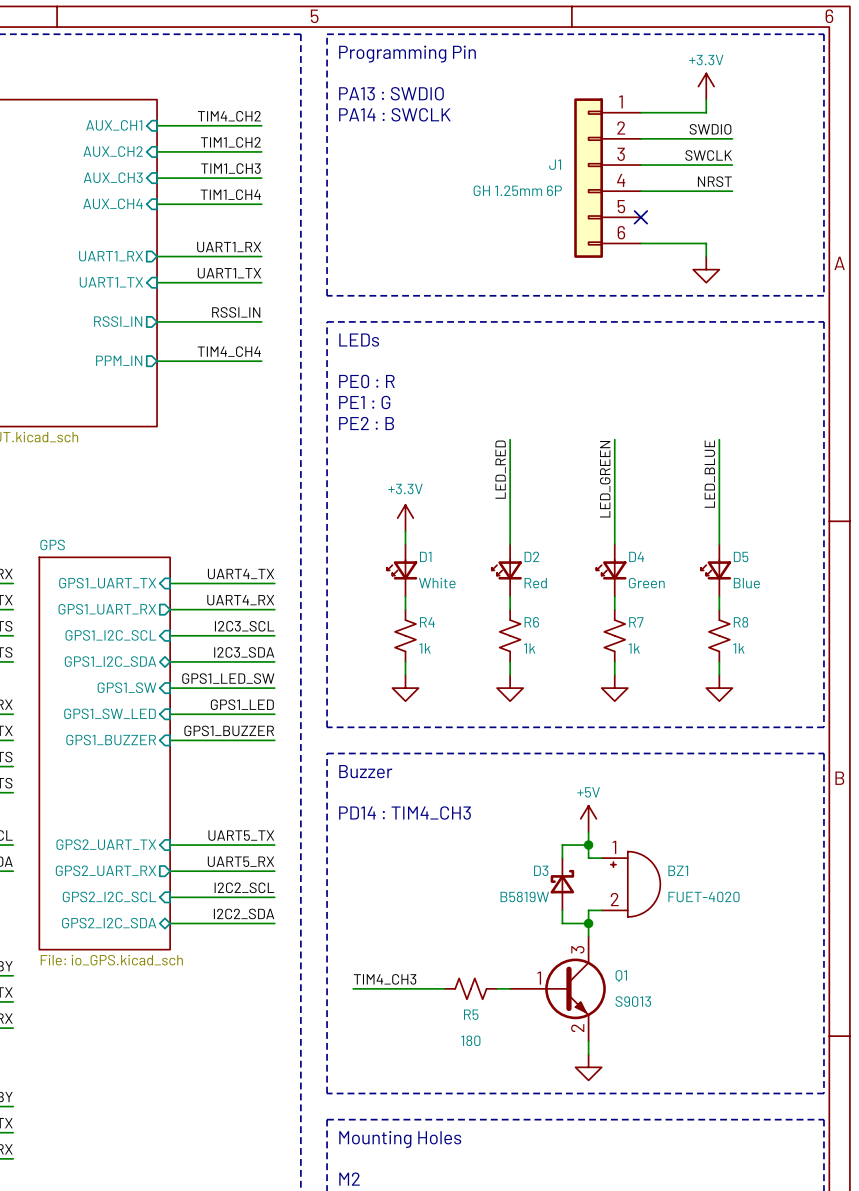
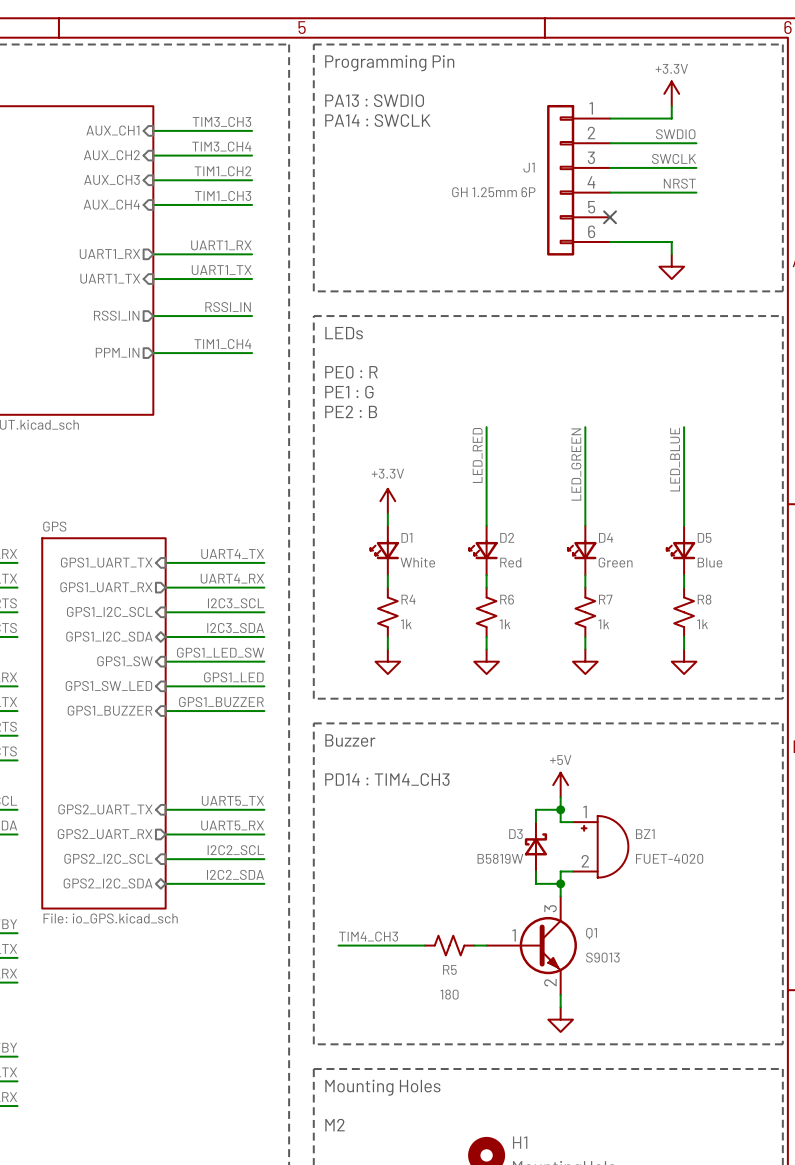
label: TIM4_CH2 (229, 116) -> TIM3_CH3 (221, 121)
label: TIM1_CH2 (230, 142) -> TIM3_CH4 (221, 146)
label: TIM1_CH3 (230, 168) -> TIM1_CH2 (222, 171)
label: TIM1_CH4 (230, 194) -> TIM1_CH3 (223, 195)
label: TIM4_CH4 (229, 351) -> TIM1_CH4 (222, 344)

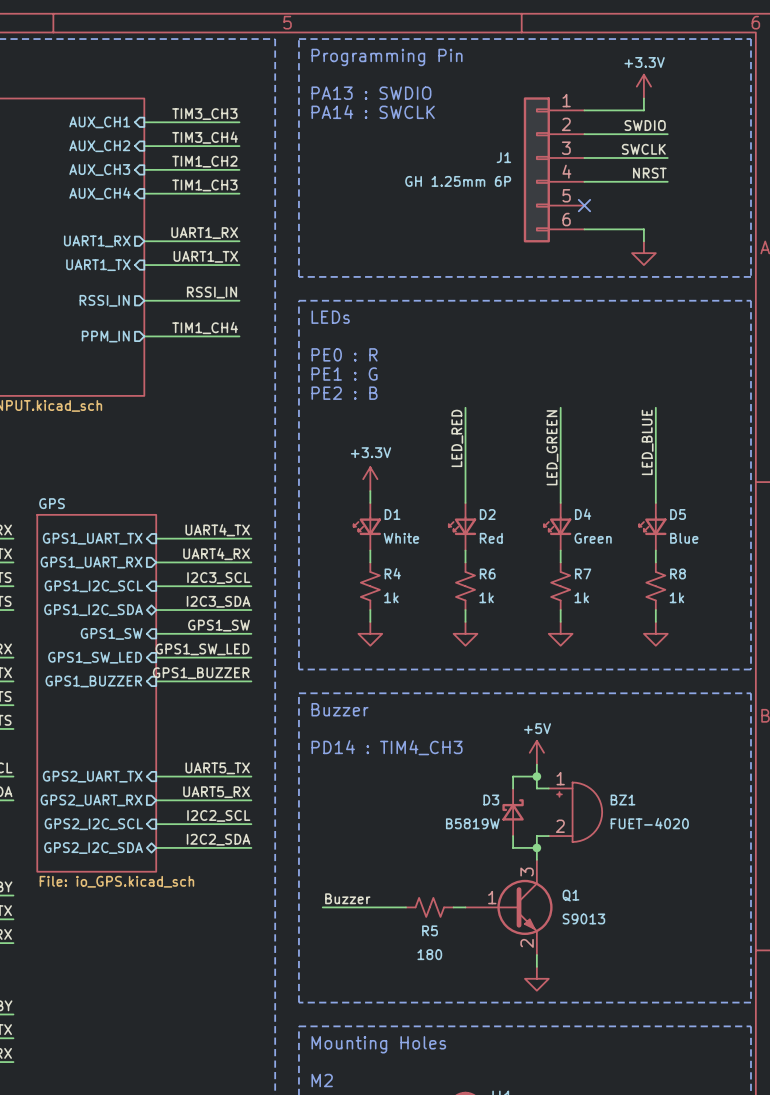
label: GPS1_LED_SW (220, 652) -> GPS1_SW (218, 625)
label: GPS1_LED (233, 677) -> GPS1_SW_LED (202, 649)
label: TIM4_CH3 (368, 936) -> Buzzer (347, 898)

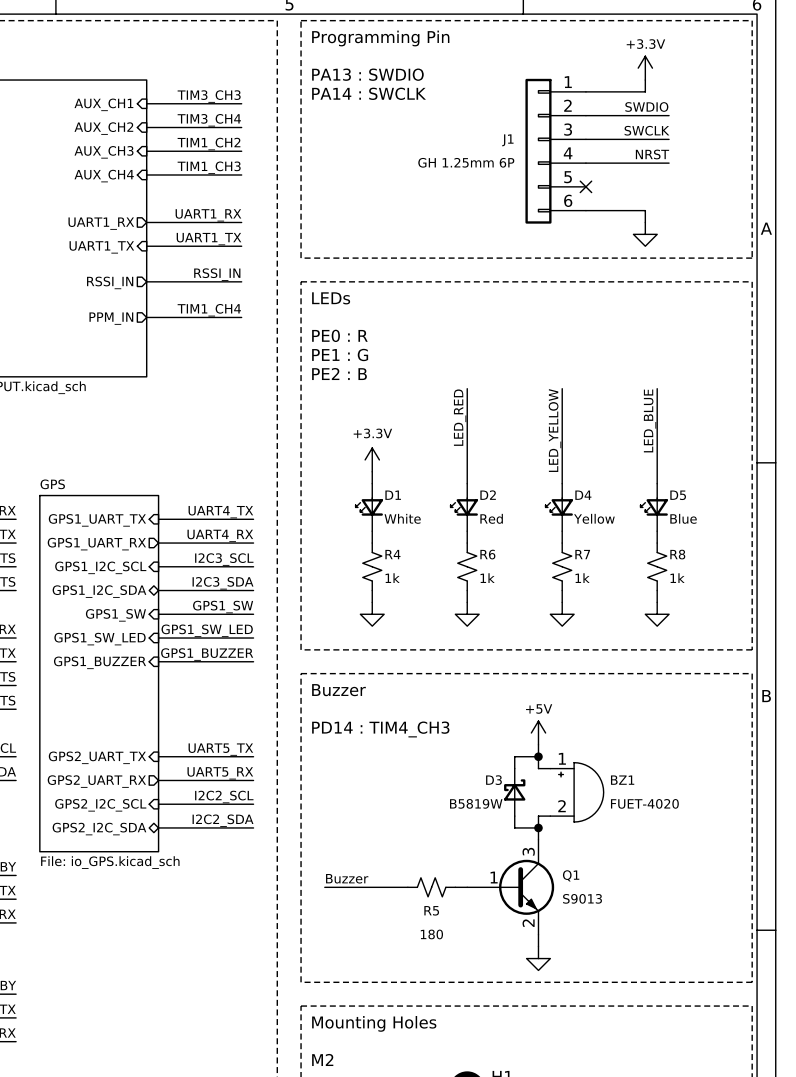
label: LED_GREEN (552, 447) -> LED_YELLOW (555, 430)
D4 value: Green (593, 538) -> Yellow (594, 518)

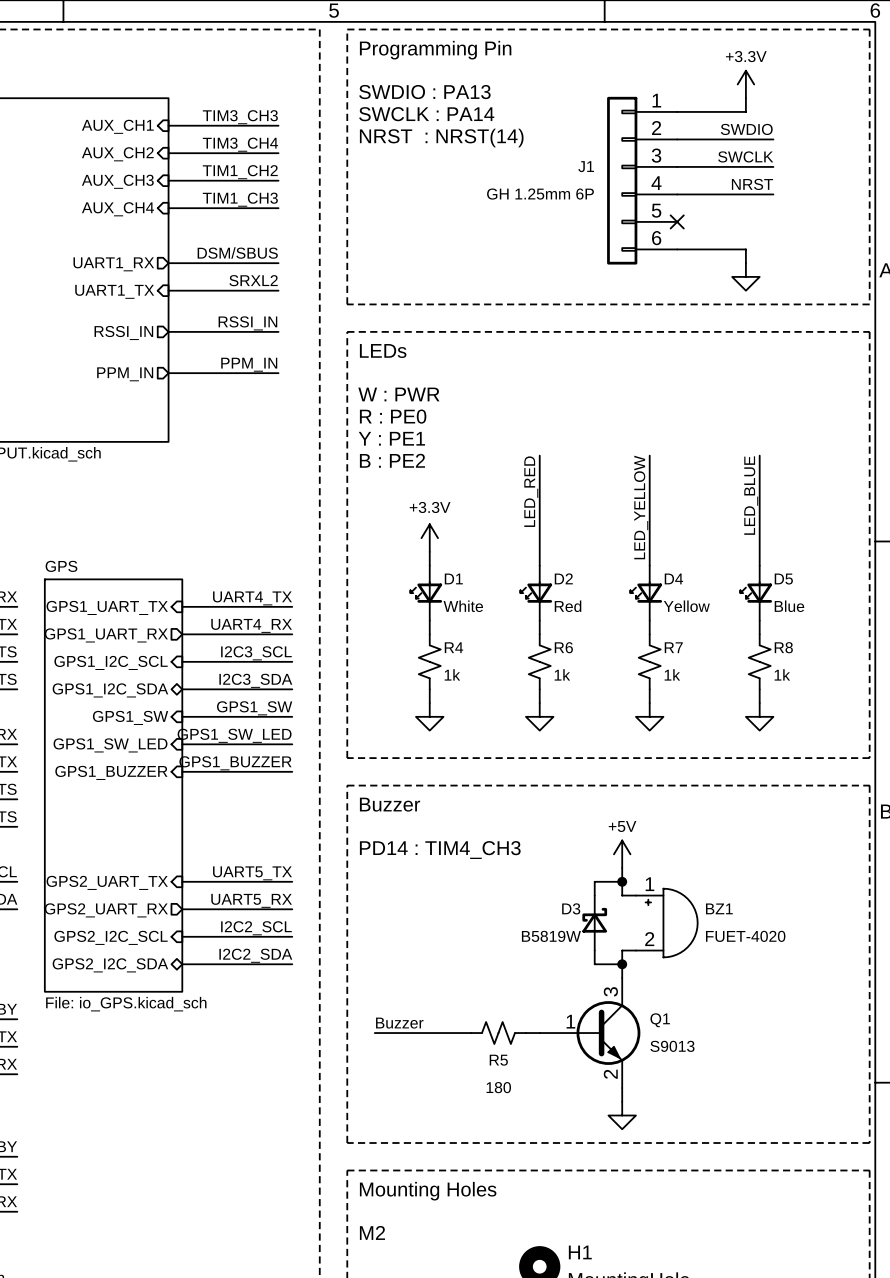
text: PA13 : SWDIO (367, 74) -> SWDIO : PA13 (424, 92)
text: PA14 : SWCLK (369, 93) -> SWCLK : PA14 (426, 114)
text: none -> NRST : NRST(14) (441, 138)
label: UART1_RX (208, 215) -> DSM/SBUS (237, 252)
label: UART1_TX (208, 239) -> SRXL2 (253, 280)
label: TIM1_CH4 (209, 310) -> PPM_IN (249, 364)
text: PE0 : R (339, 335) -> W : PWR (398, 394)
text: PE1 : G (340, 354) -> R : PE0 (393, 416)
text: PE2 : B (339, 373) -> Y : PE1 (391, 438)
text: none -> B : PE2 (392, 460)

